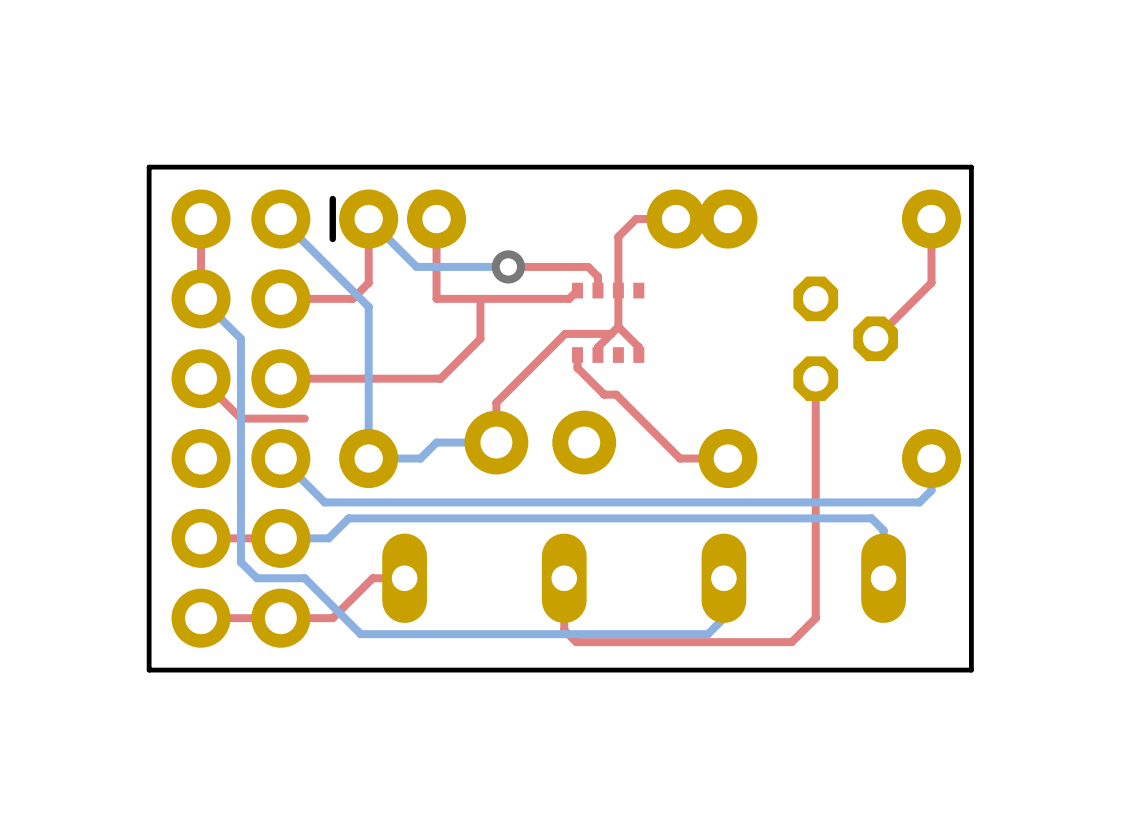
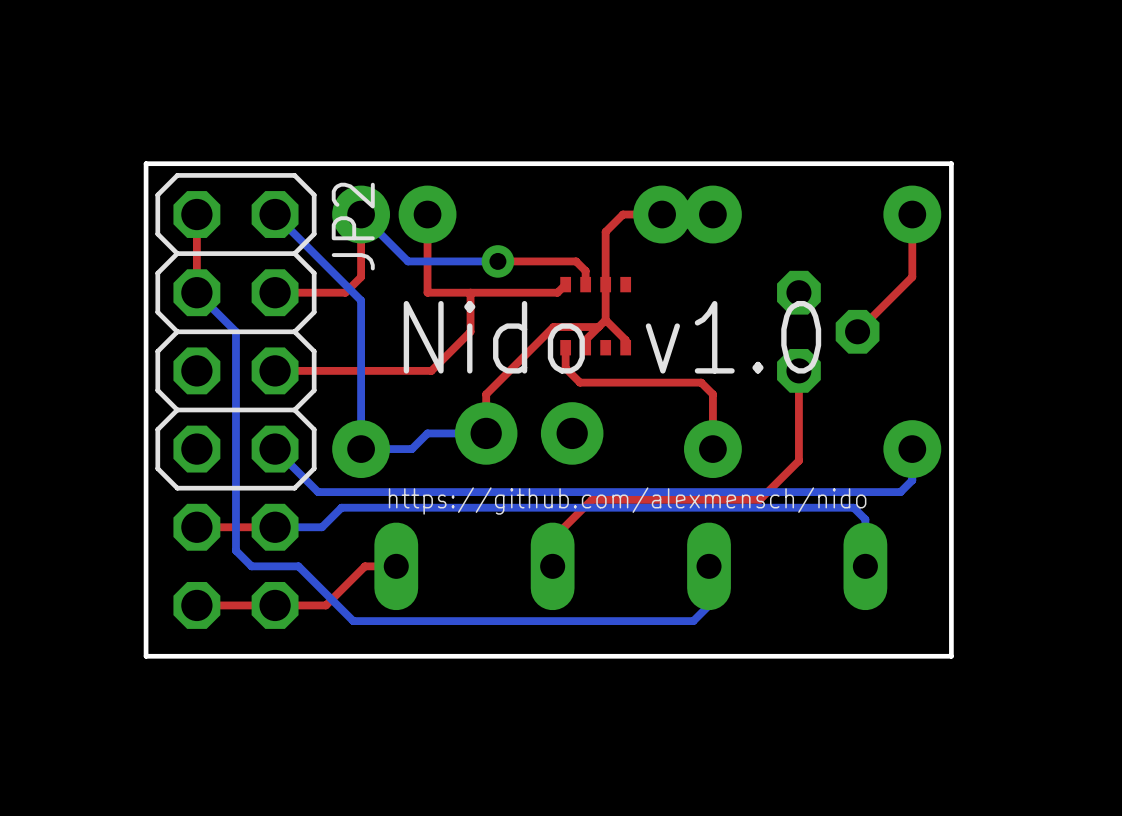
JP2: none -> (235, 331)
text: none -> Nido v1.0 (612, 337)
top track: (577, 368) (604, 394) (616, 394) (680, 458) (727, 458) -> (565, 360) (565, 368) (580, 382) (701, 382) (712, 394) (712, 449)
top track: (201, 378) (240, 418) (304, 418) -> none
part: (253, 418) -> none
top track: (815, 470) (815, 618) (791, 642) (576, 642) (564, 630) (564, 578) -> (798, 460) (759, 499) (591, 499) (552, 538) (552, 566)
text: none -> https://github.com/alexmensch/nido (627, 501)
part: none -> (235, 566)

